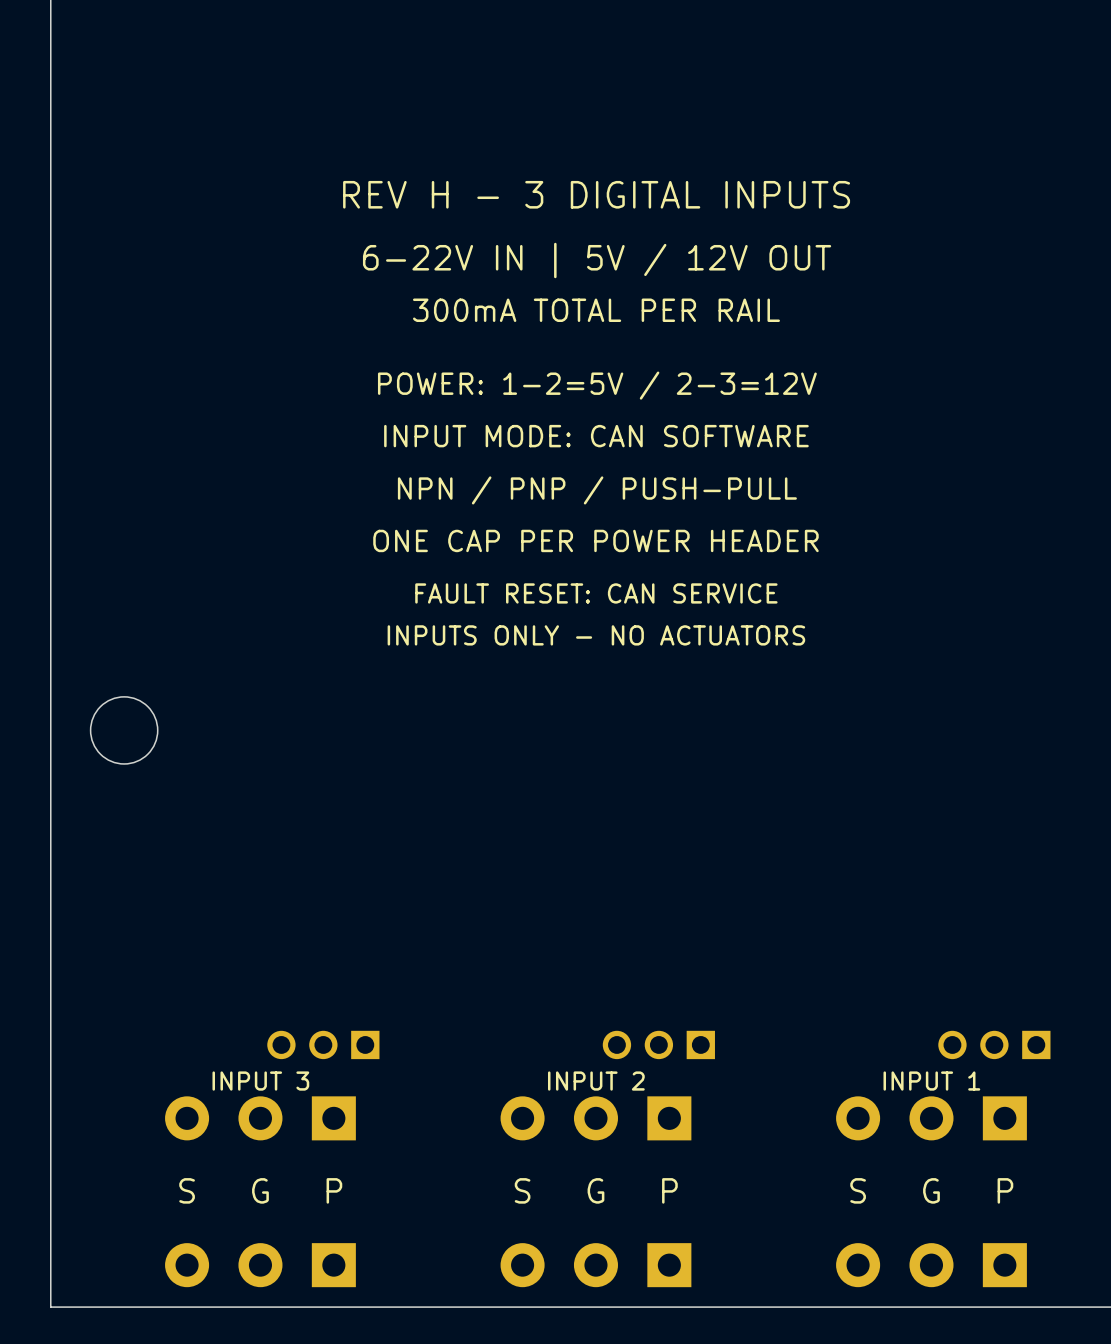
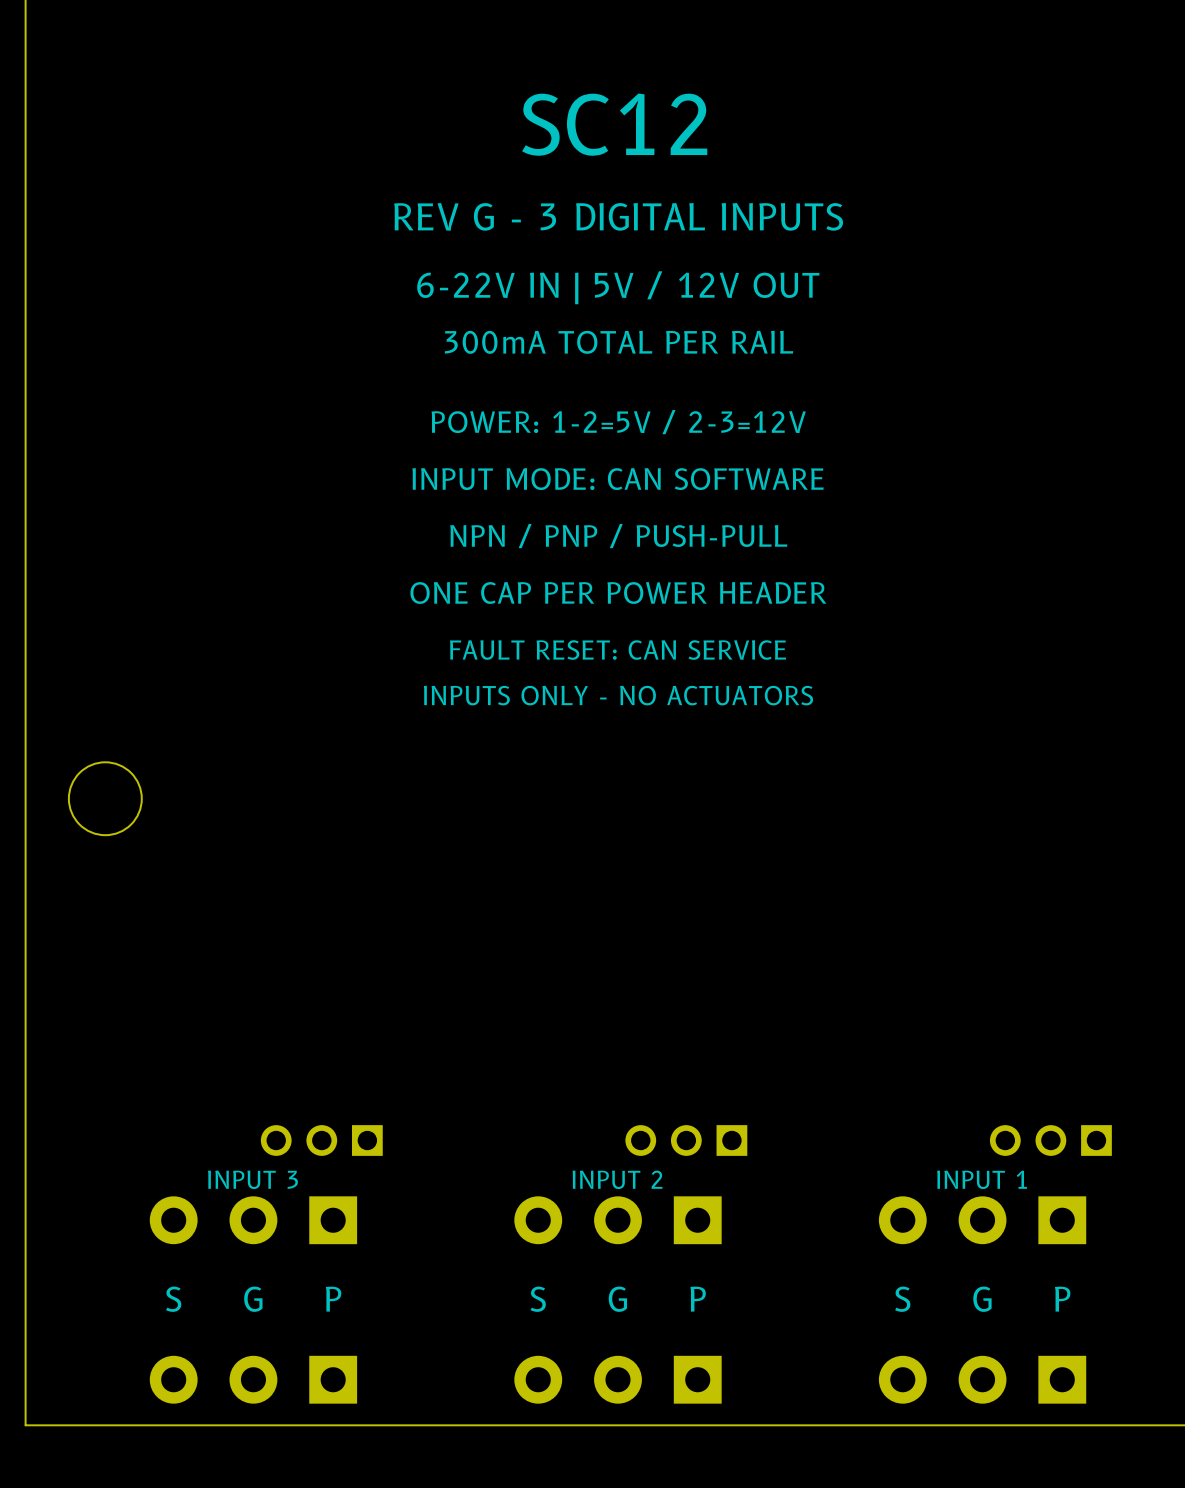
text: none -> SC12 (614, 124)
text: REV H - 3 DIGITAL INPUTS (596, 194) -> REV G - 3 DIGITAL INPUTS (618, 216)

